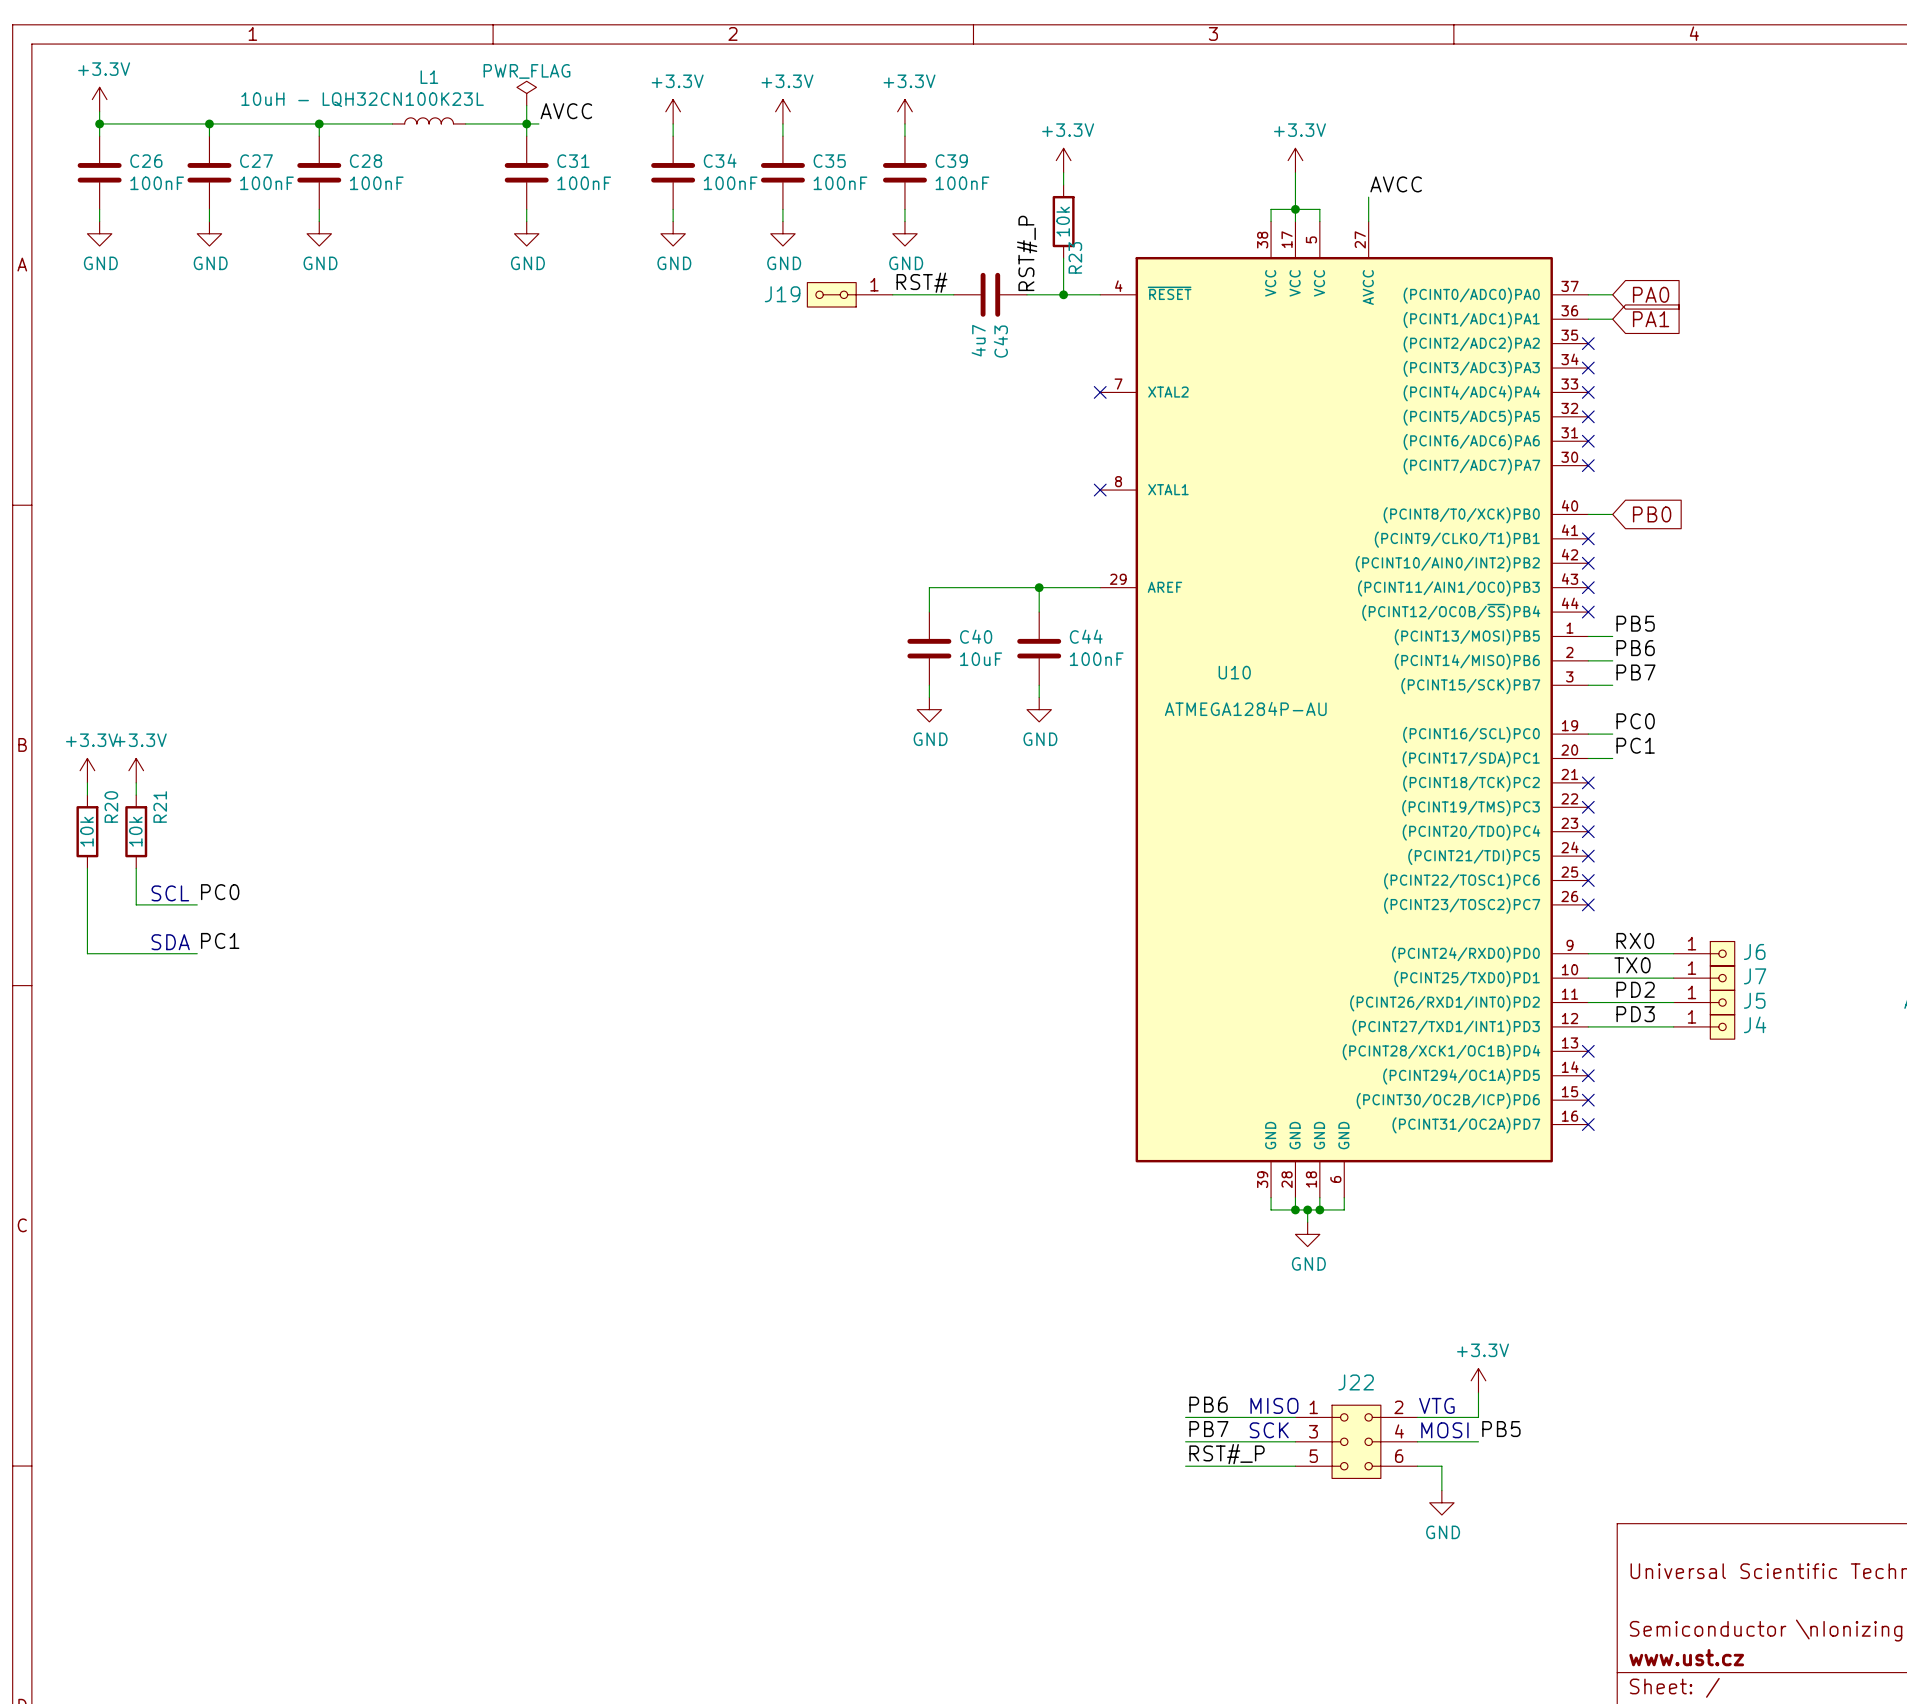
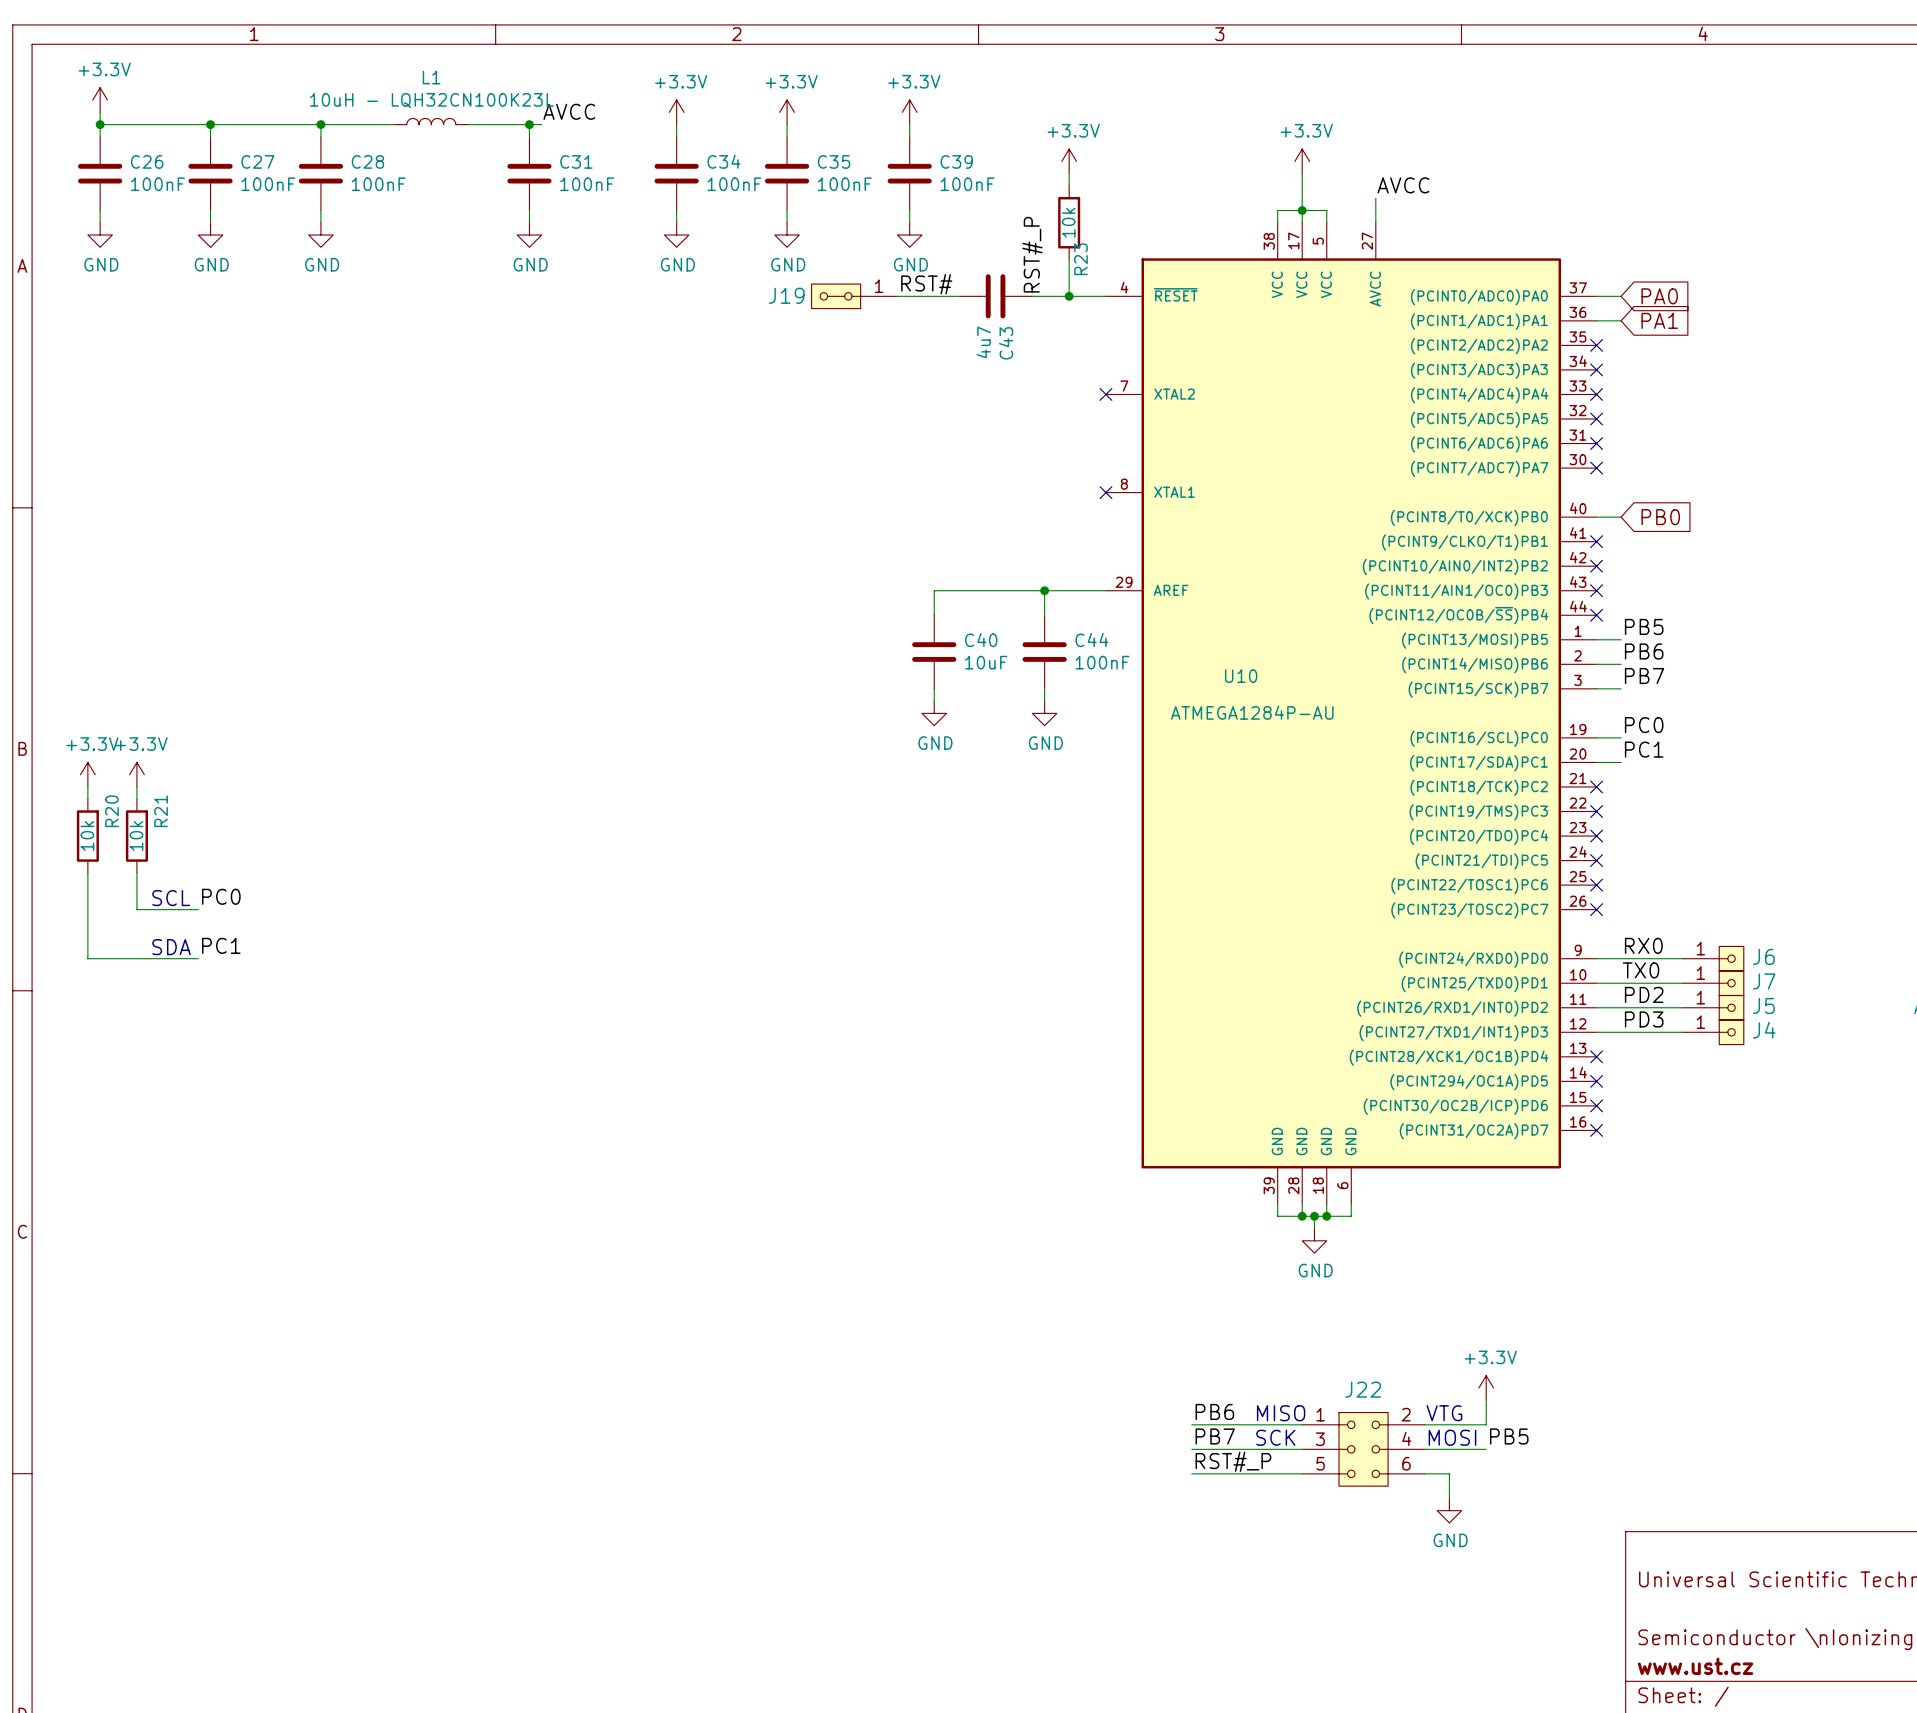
power symbol: PWR_FLAG (526, 93) -> none
L1 value position: 10uH - LQH32CN100K23L (362, 99) -> 10uH - LQH32CN100K23L (431, 100)
wire: (526, 105) (526, 123) -> none

